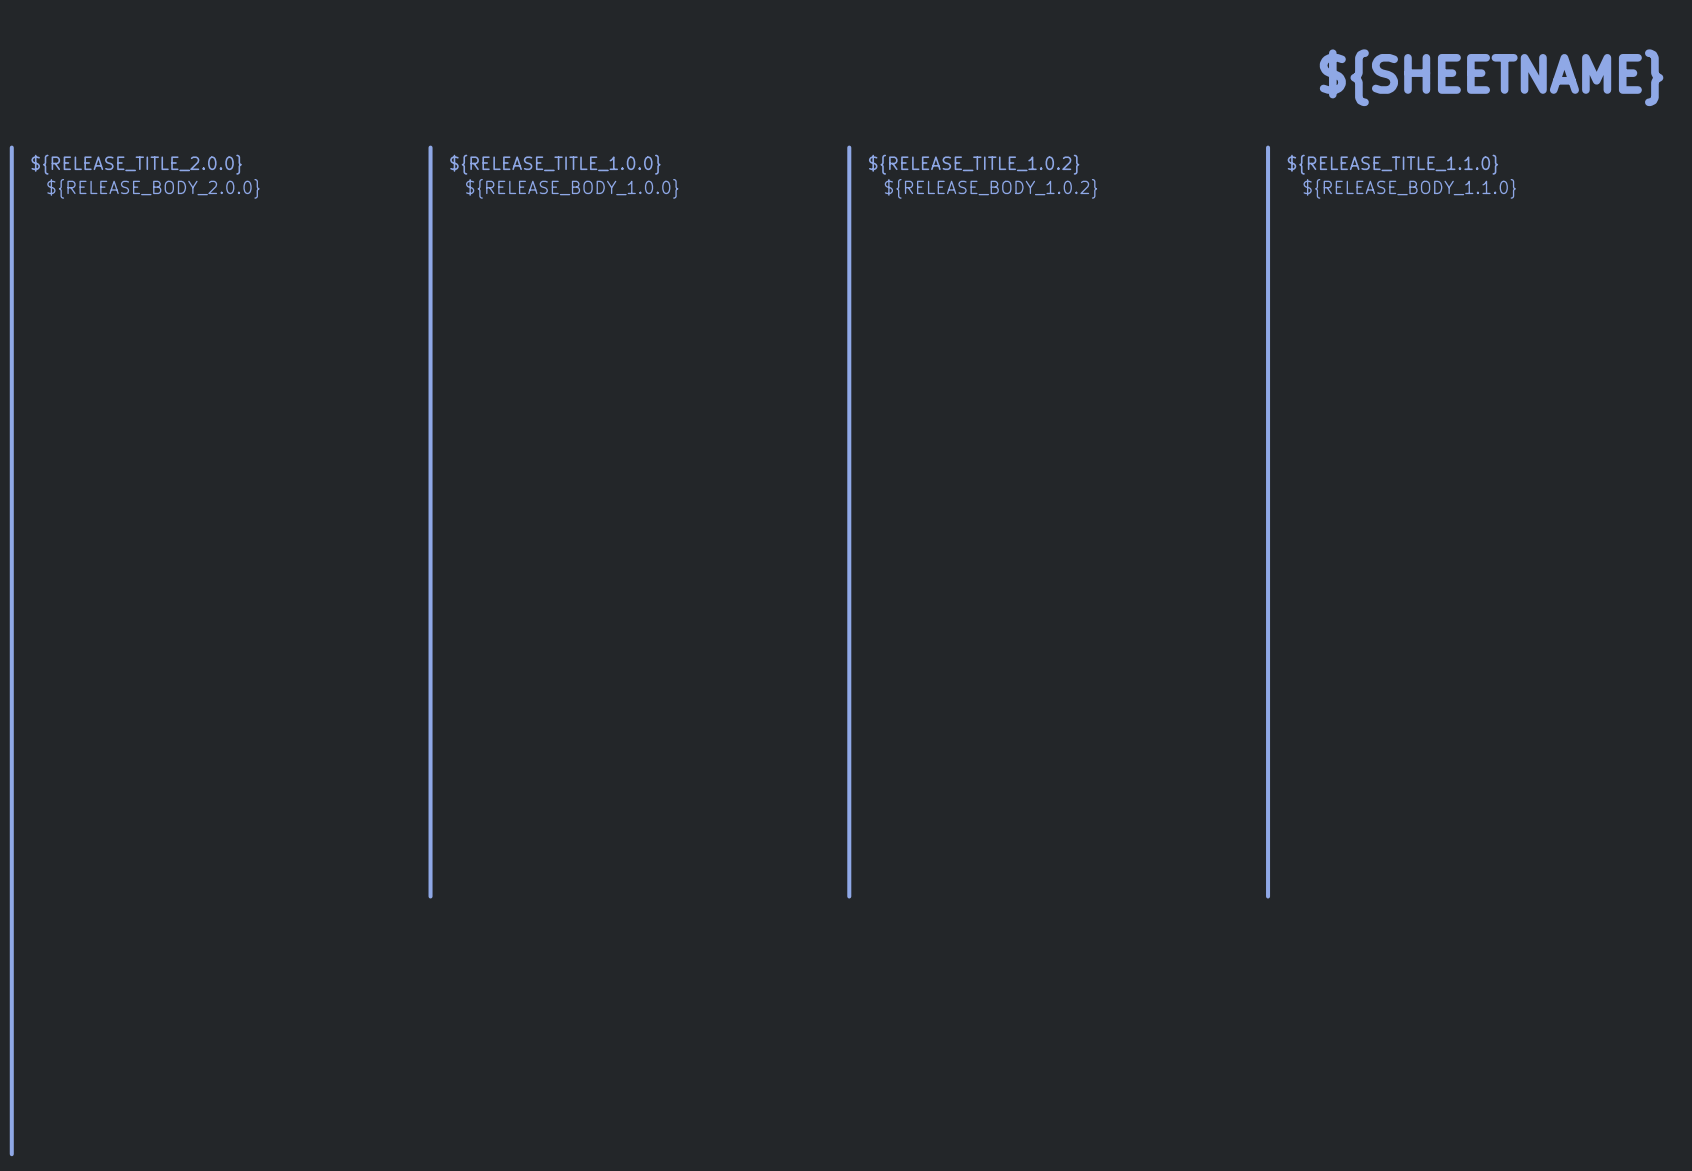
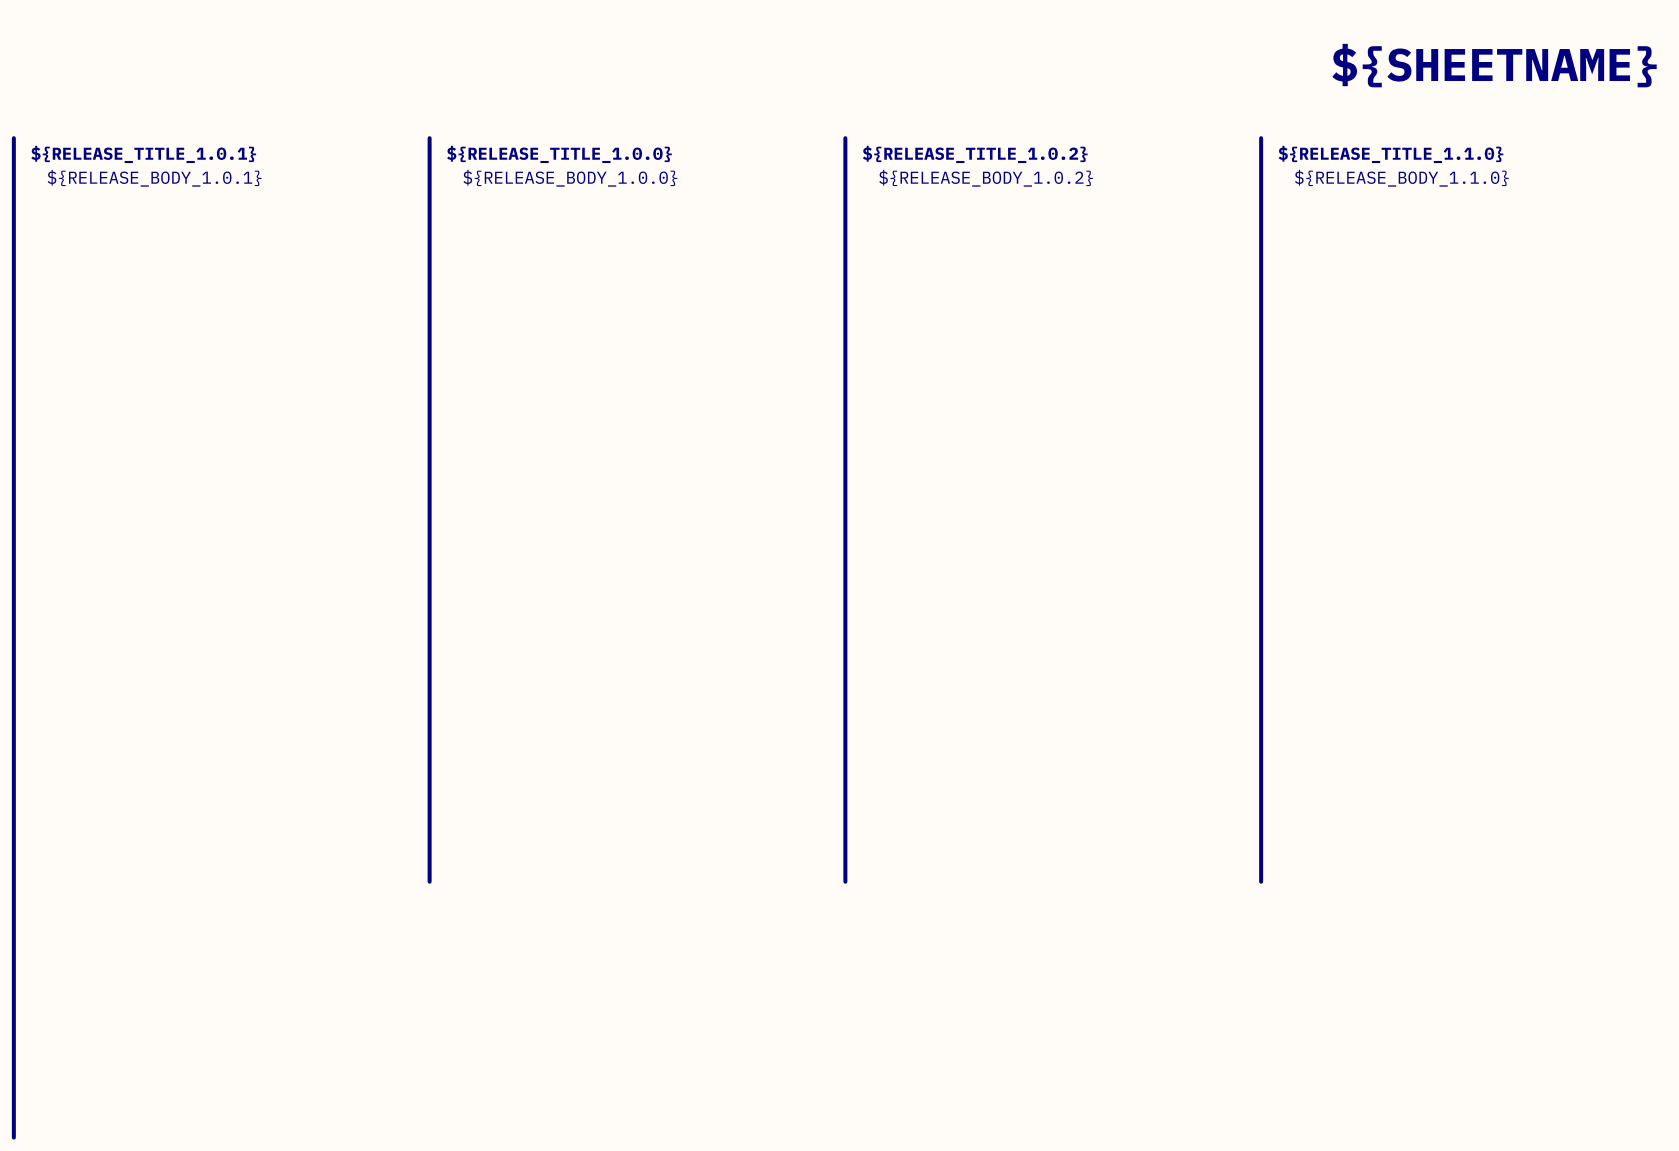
text: ${RELEASE_TITLE_2.0.0} (136, 164) -> ${RELEASE_TITLE_1.0.1} (143, 154)
text: ${RELEASE_BODY_2.0.0} (153, 188) -> ${RELEASE_BODY_1.0.1} (154, 178)

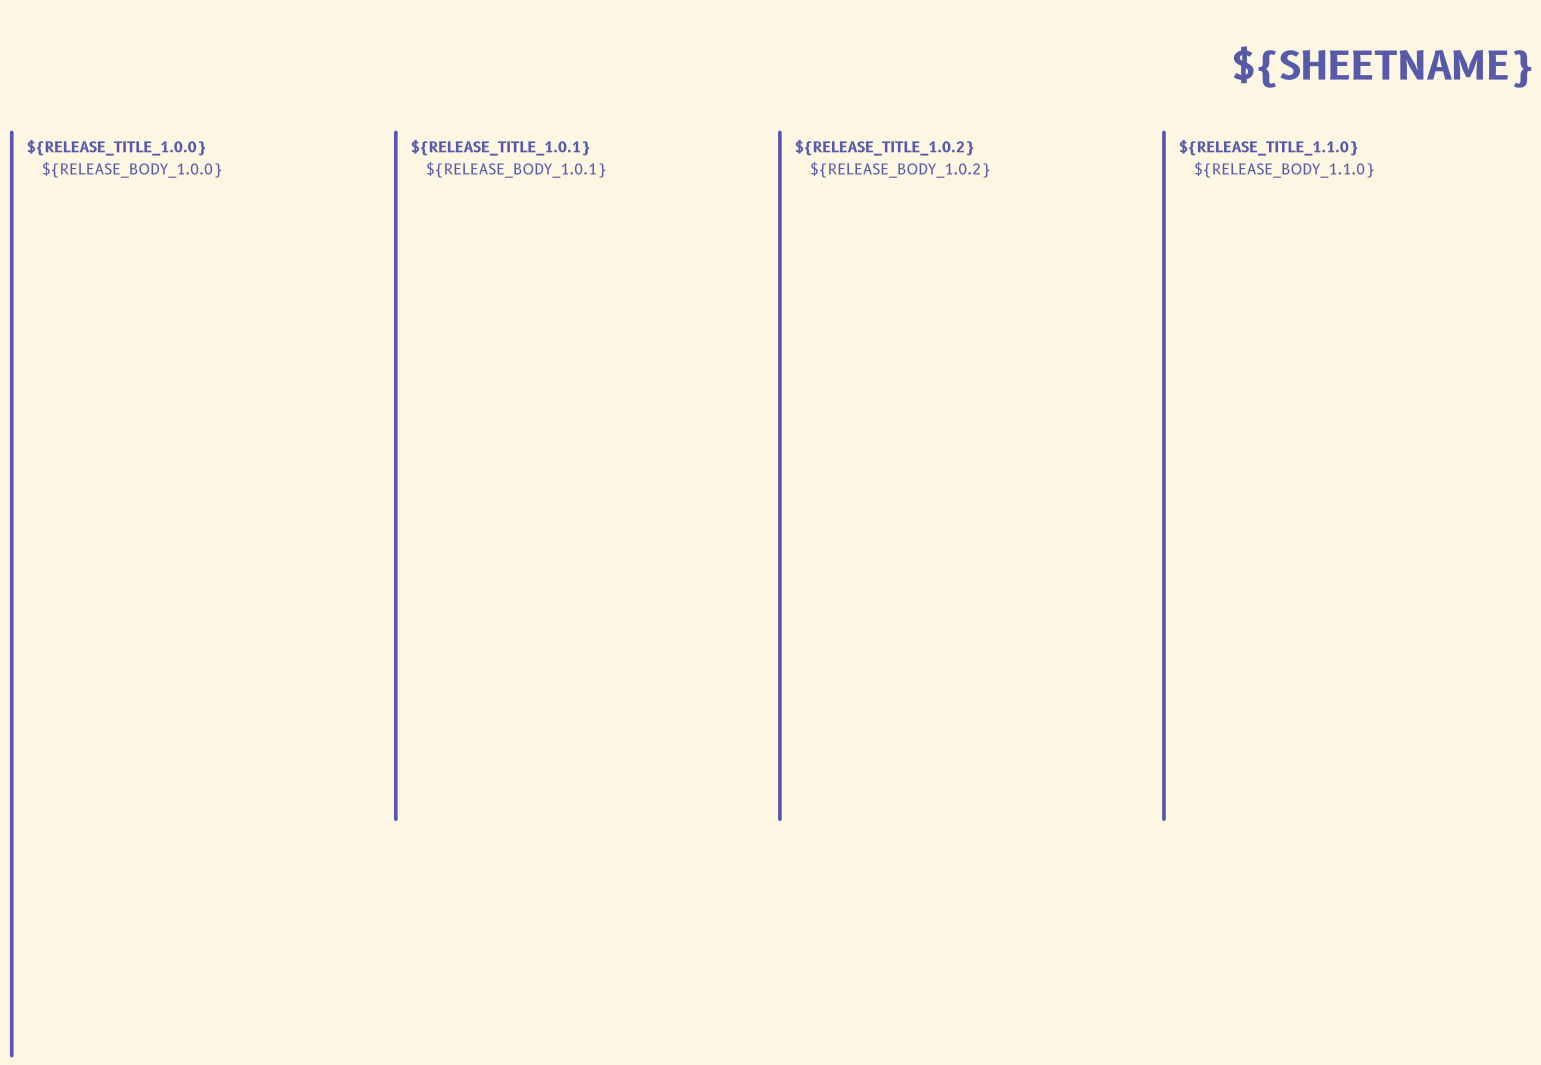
text: ${RELEASE_TITLE_1.0.1} (143, 154) -> ${RELEASE_TITLE_1.0.0} (116, 147)
text: ${RELEASE_TITLE_1.0.0} (559, 154) -> ${RELEASE_TITLE_1.0.1} (500, 147)
text: ${RELEASE_BODY_1.0.1} (154, 178) -> ${RELEASE_BODY_1.0.0} (132, 169)
text: ${RELEASE_BODY_1.0.0} (570, 178) -> ${RELEASE_BODY_1.0.1} (516, 169)

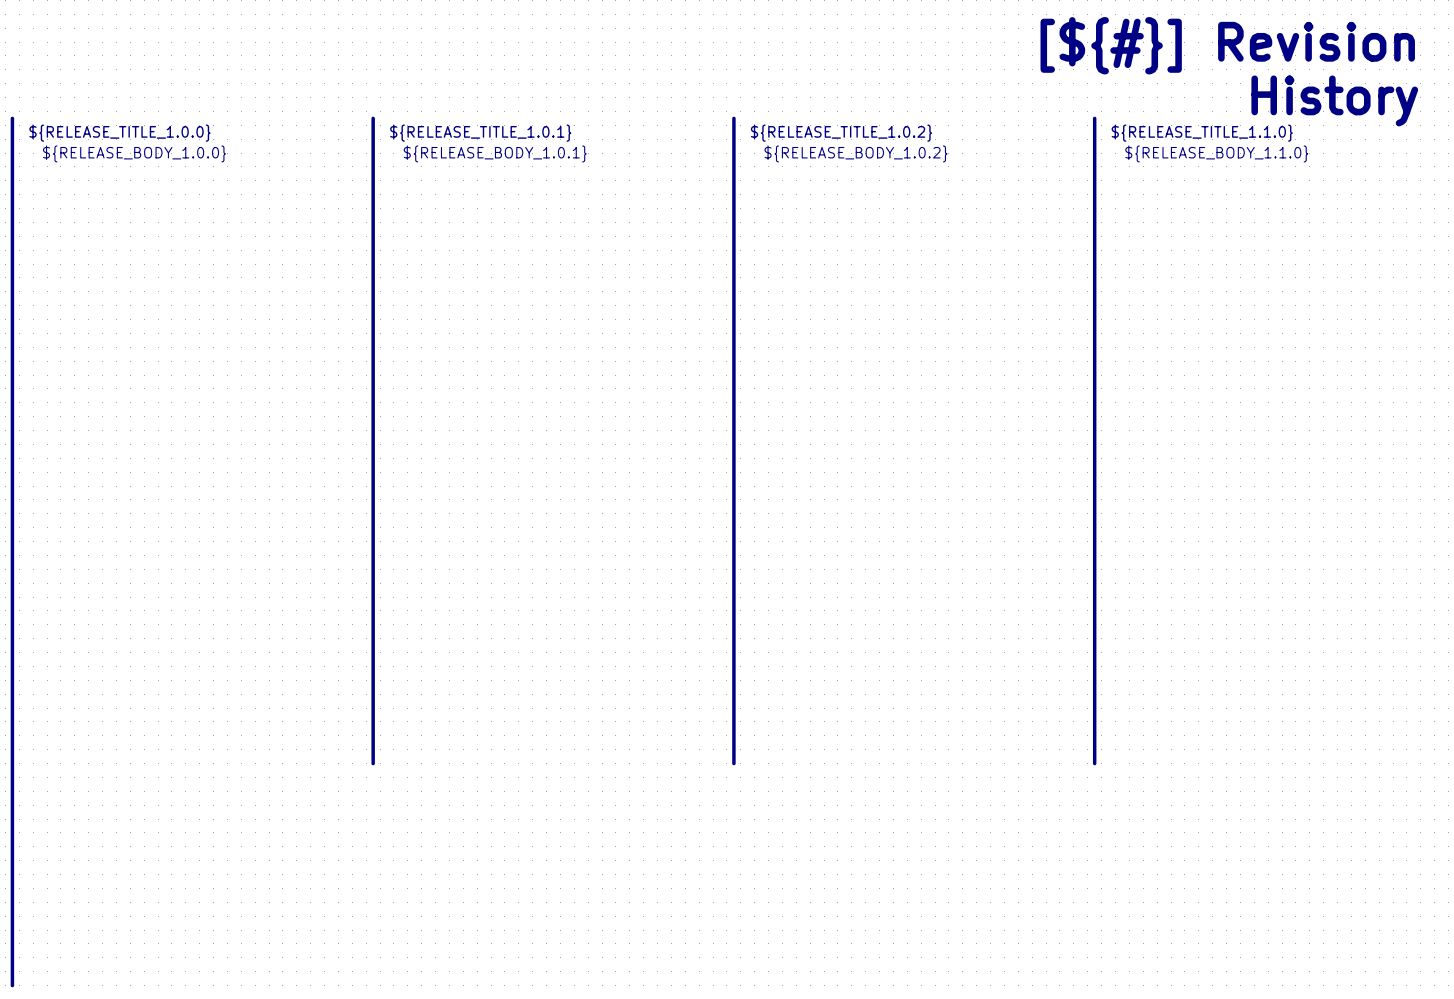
text: none -> [${#}] Revision (1227, 45)
text: ${SHEETNAME} (1382, 66) -> none
text: none -> History (1334, 100)

